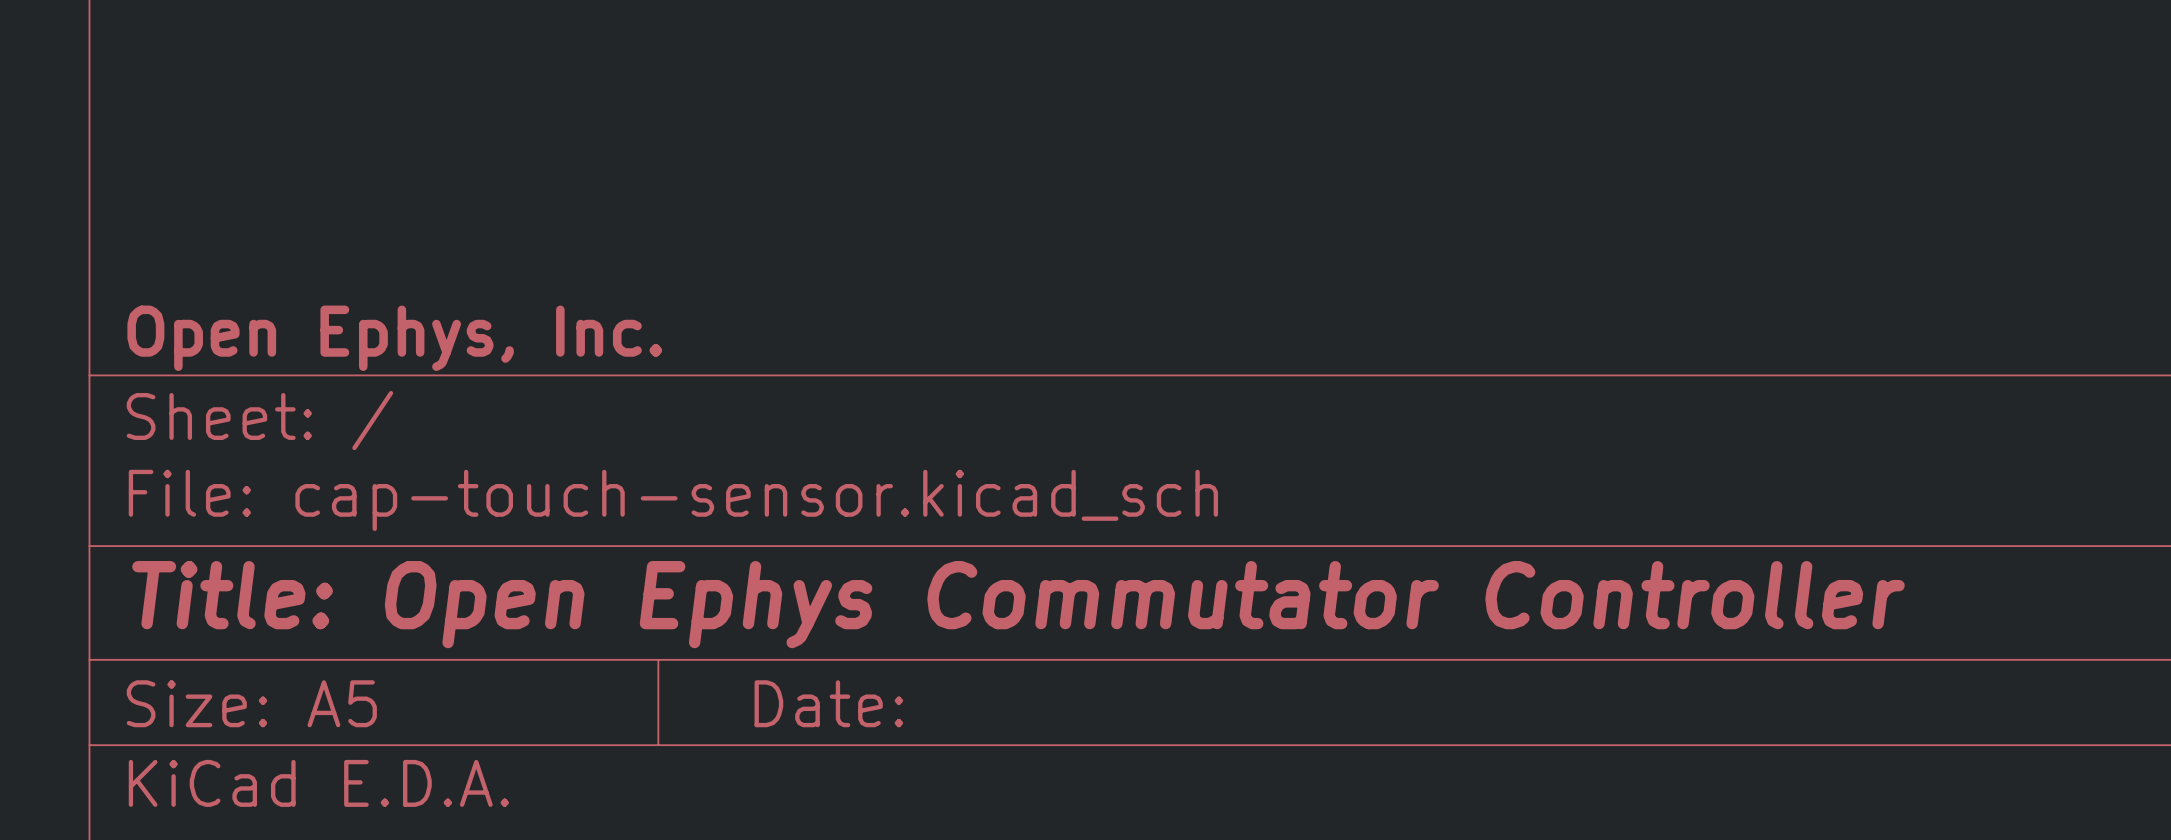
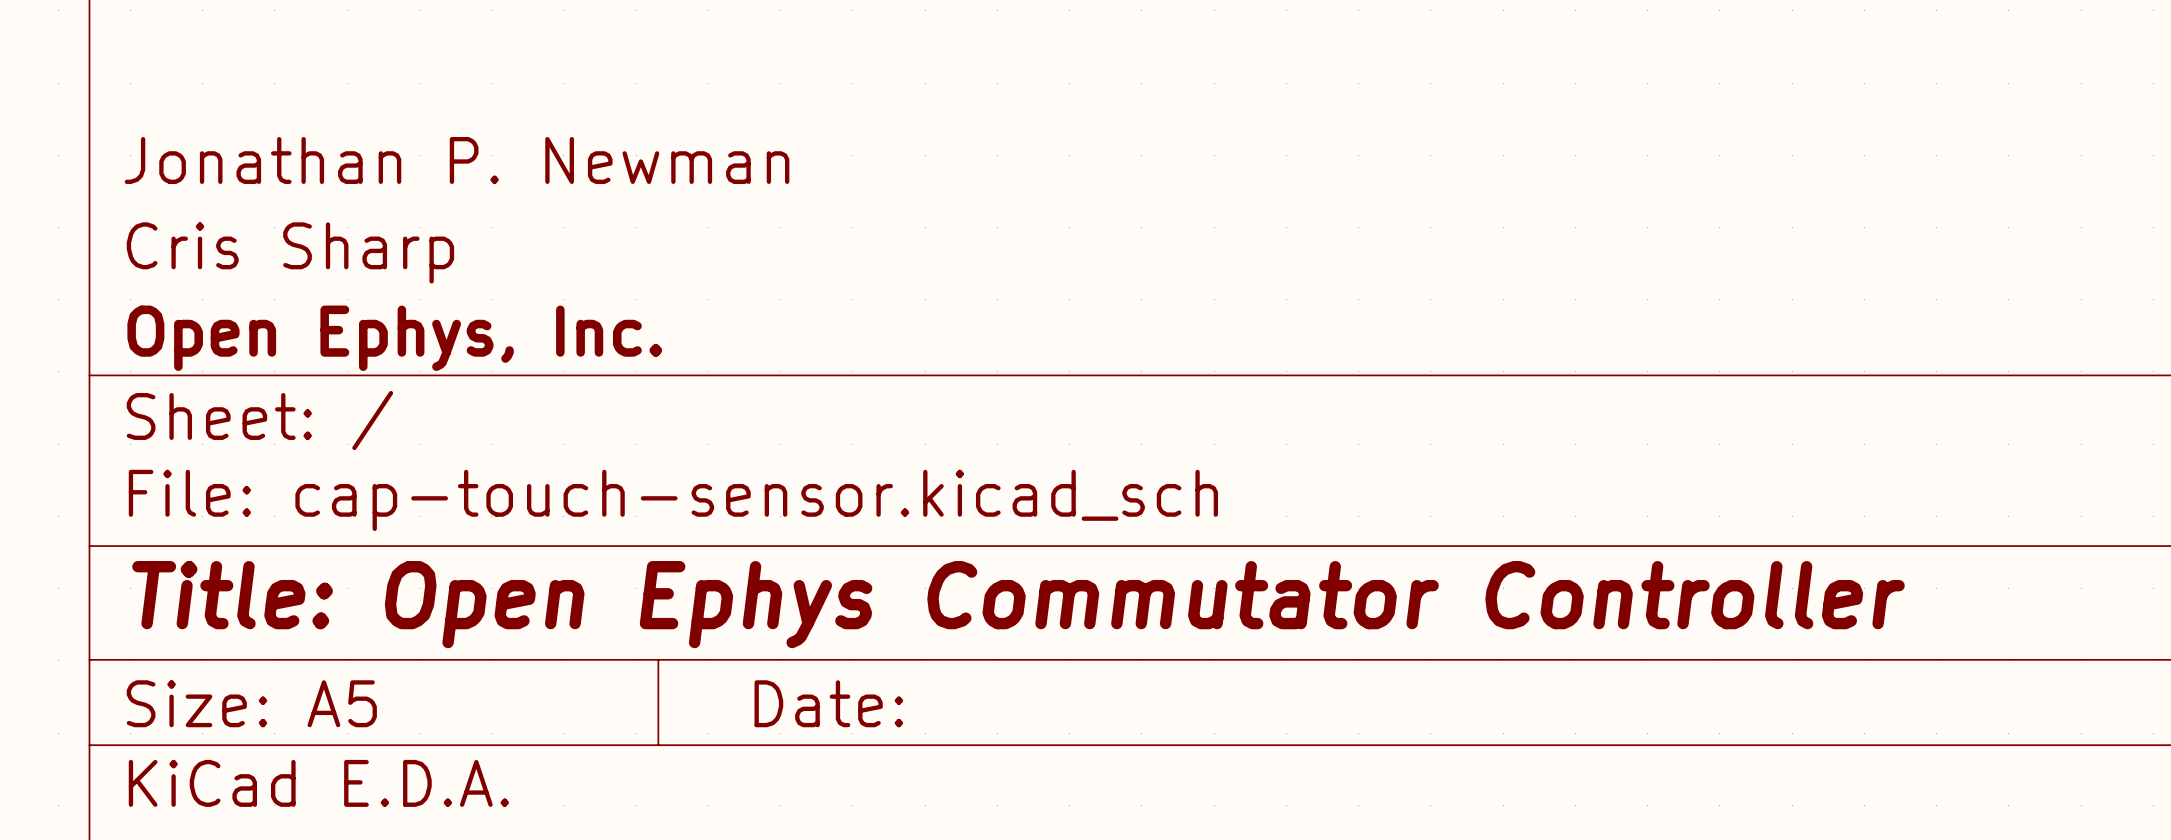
title block: none -> Jonathan P. Newman (457, 160)
title block: none -> Cris Sharp (290, 252)

